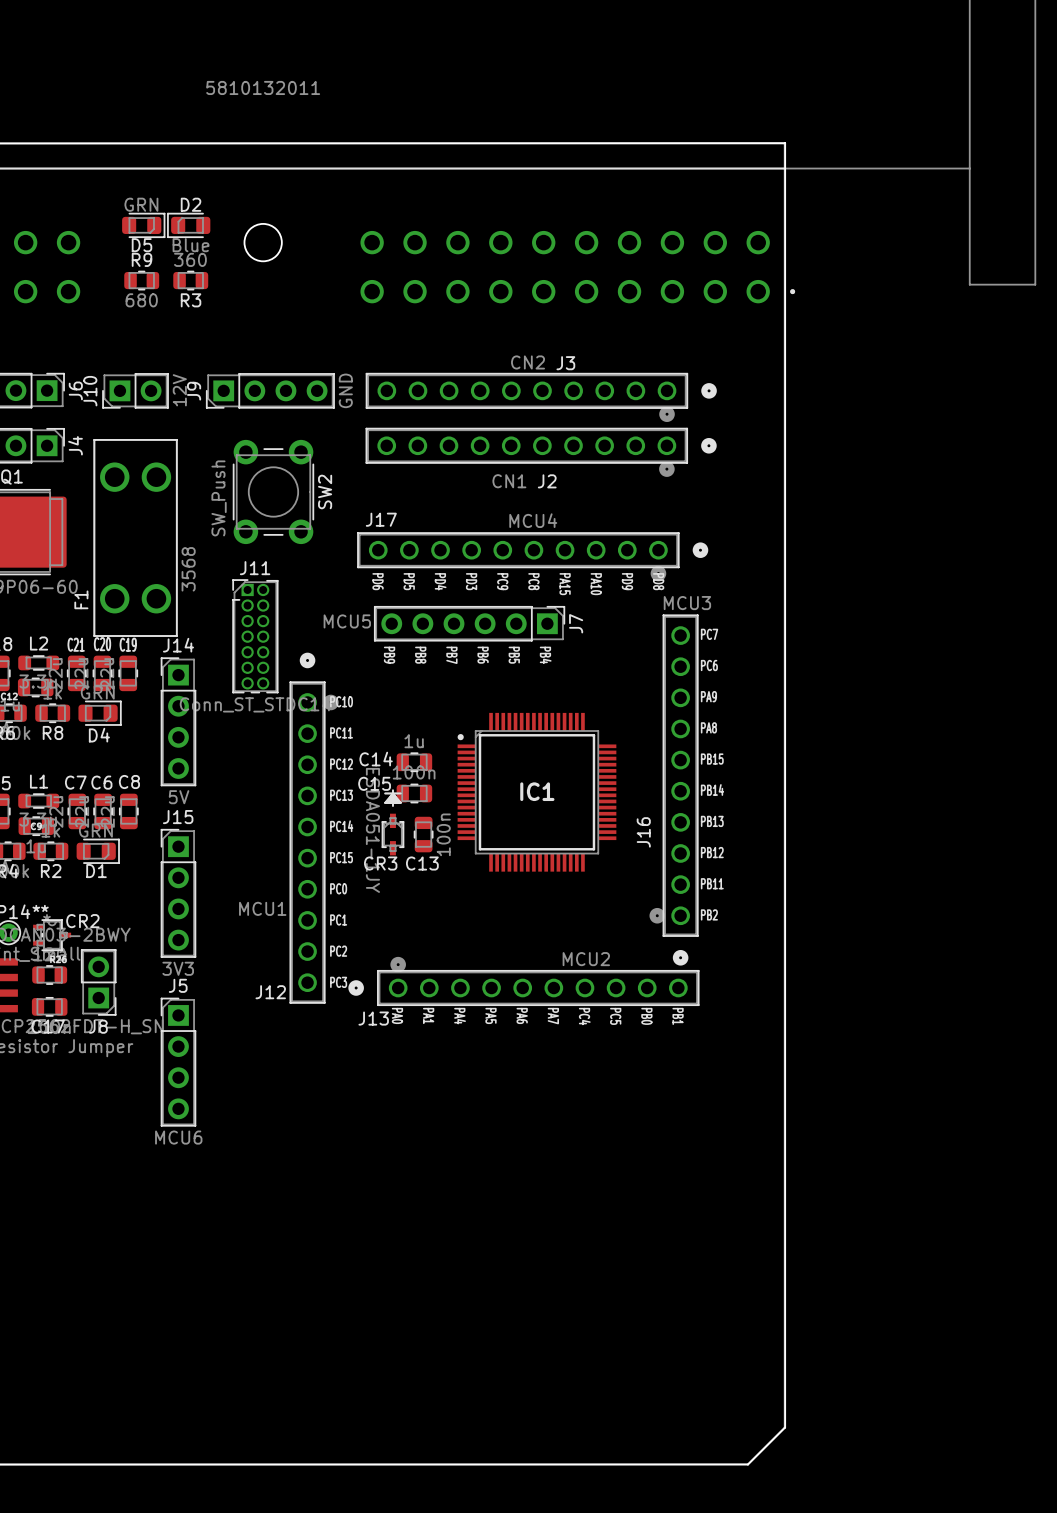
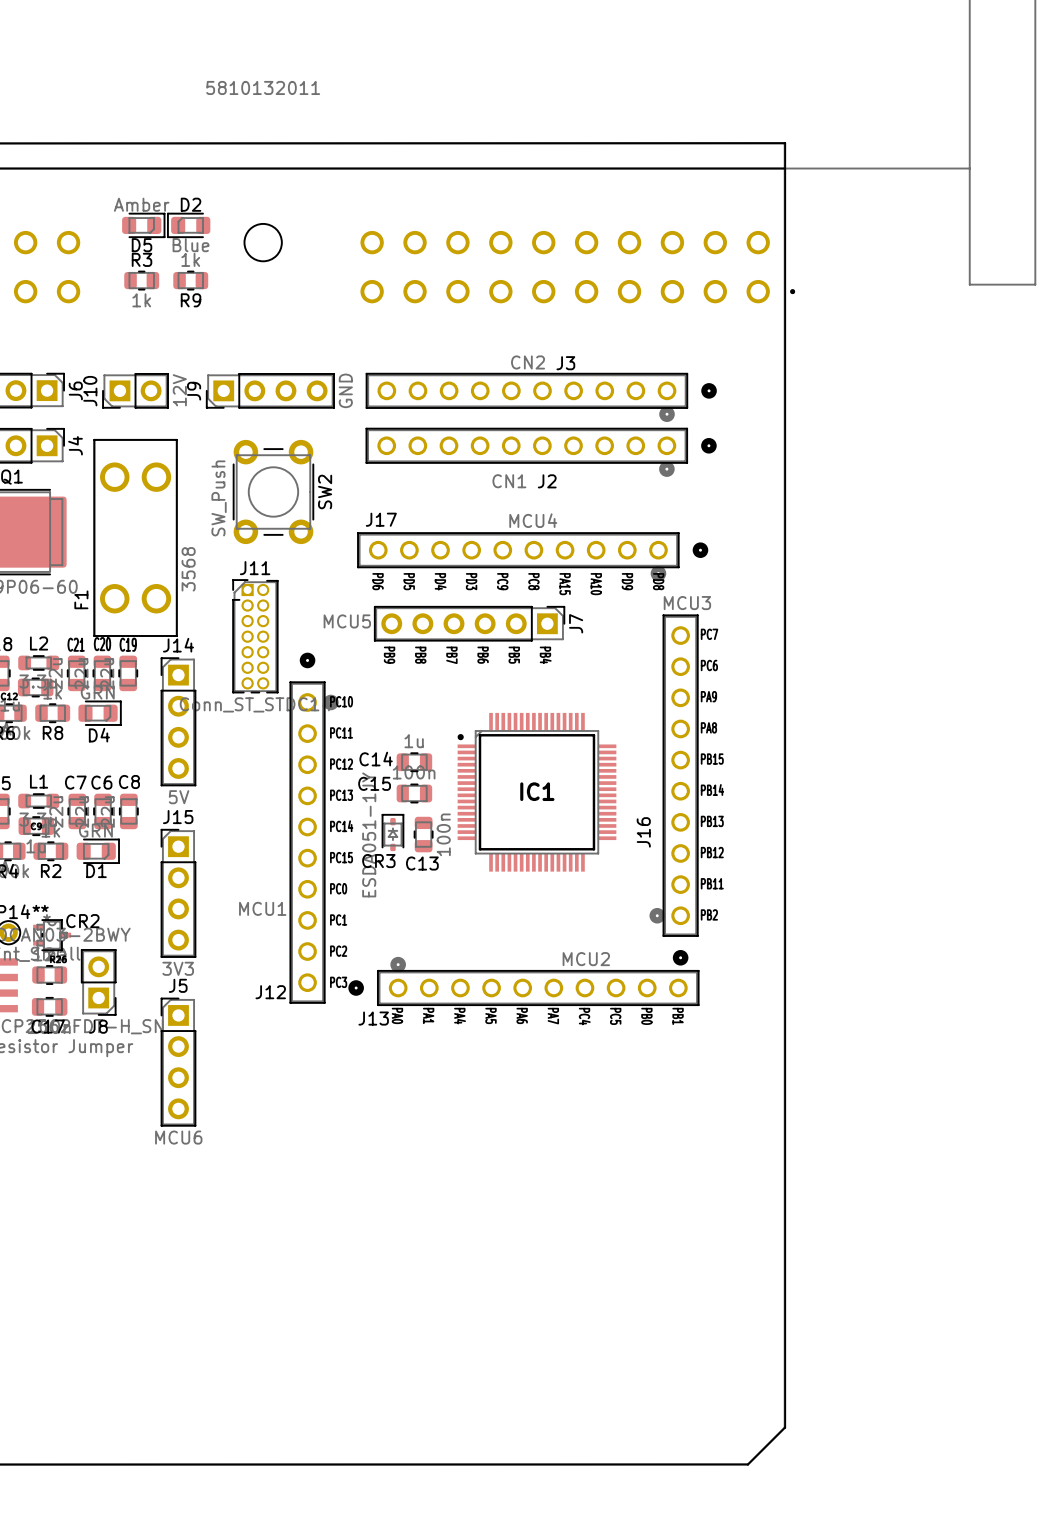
D5 value: GRN (141, 204) -> Amber (141, 204)
R9 name: R9 (142, 259) -> R3 (142, 259)
R3 value: 360 (190, 259) -> 1k (190, 259)
R9 value: 680 (141, 300) -> 1k (141, 300)
R3 name: R3 (191, 300) -> R9 (191, 300)
CR3 footprint: [381, 789, 405, 856] -> [381, 814, 405, 852]

